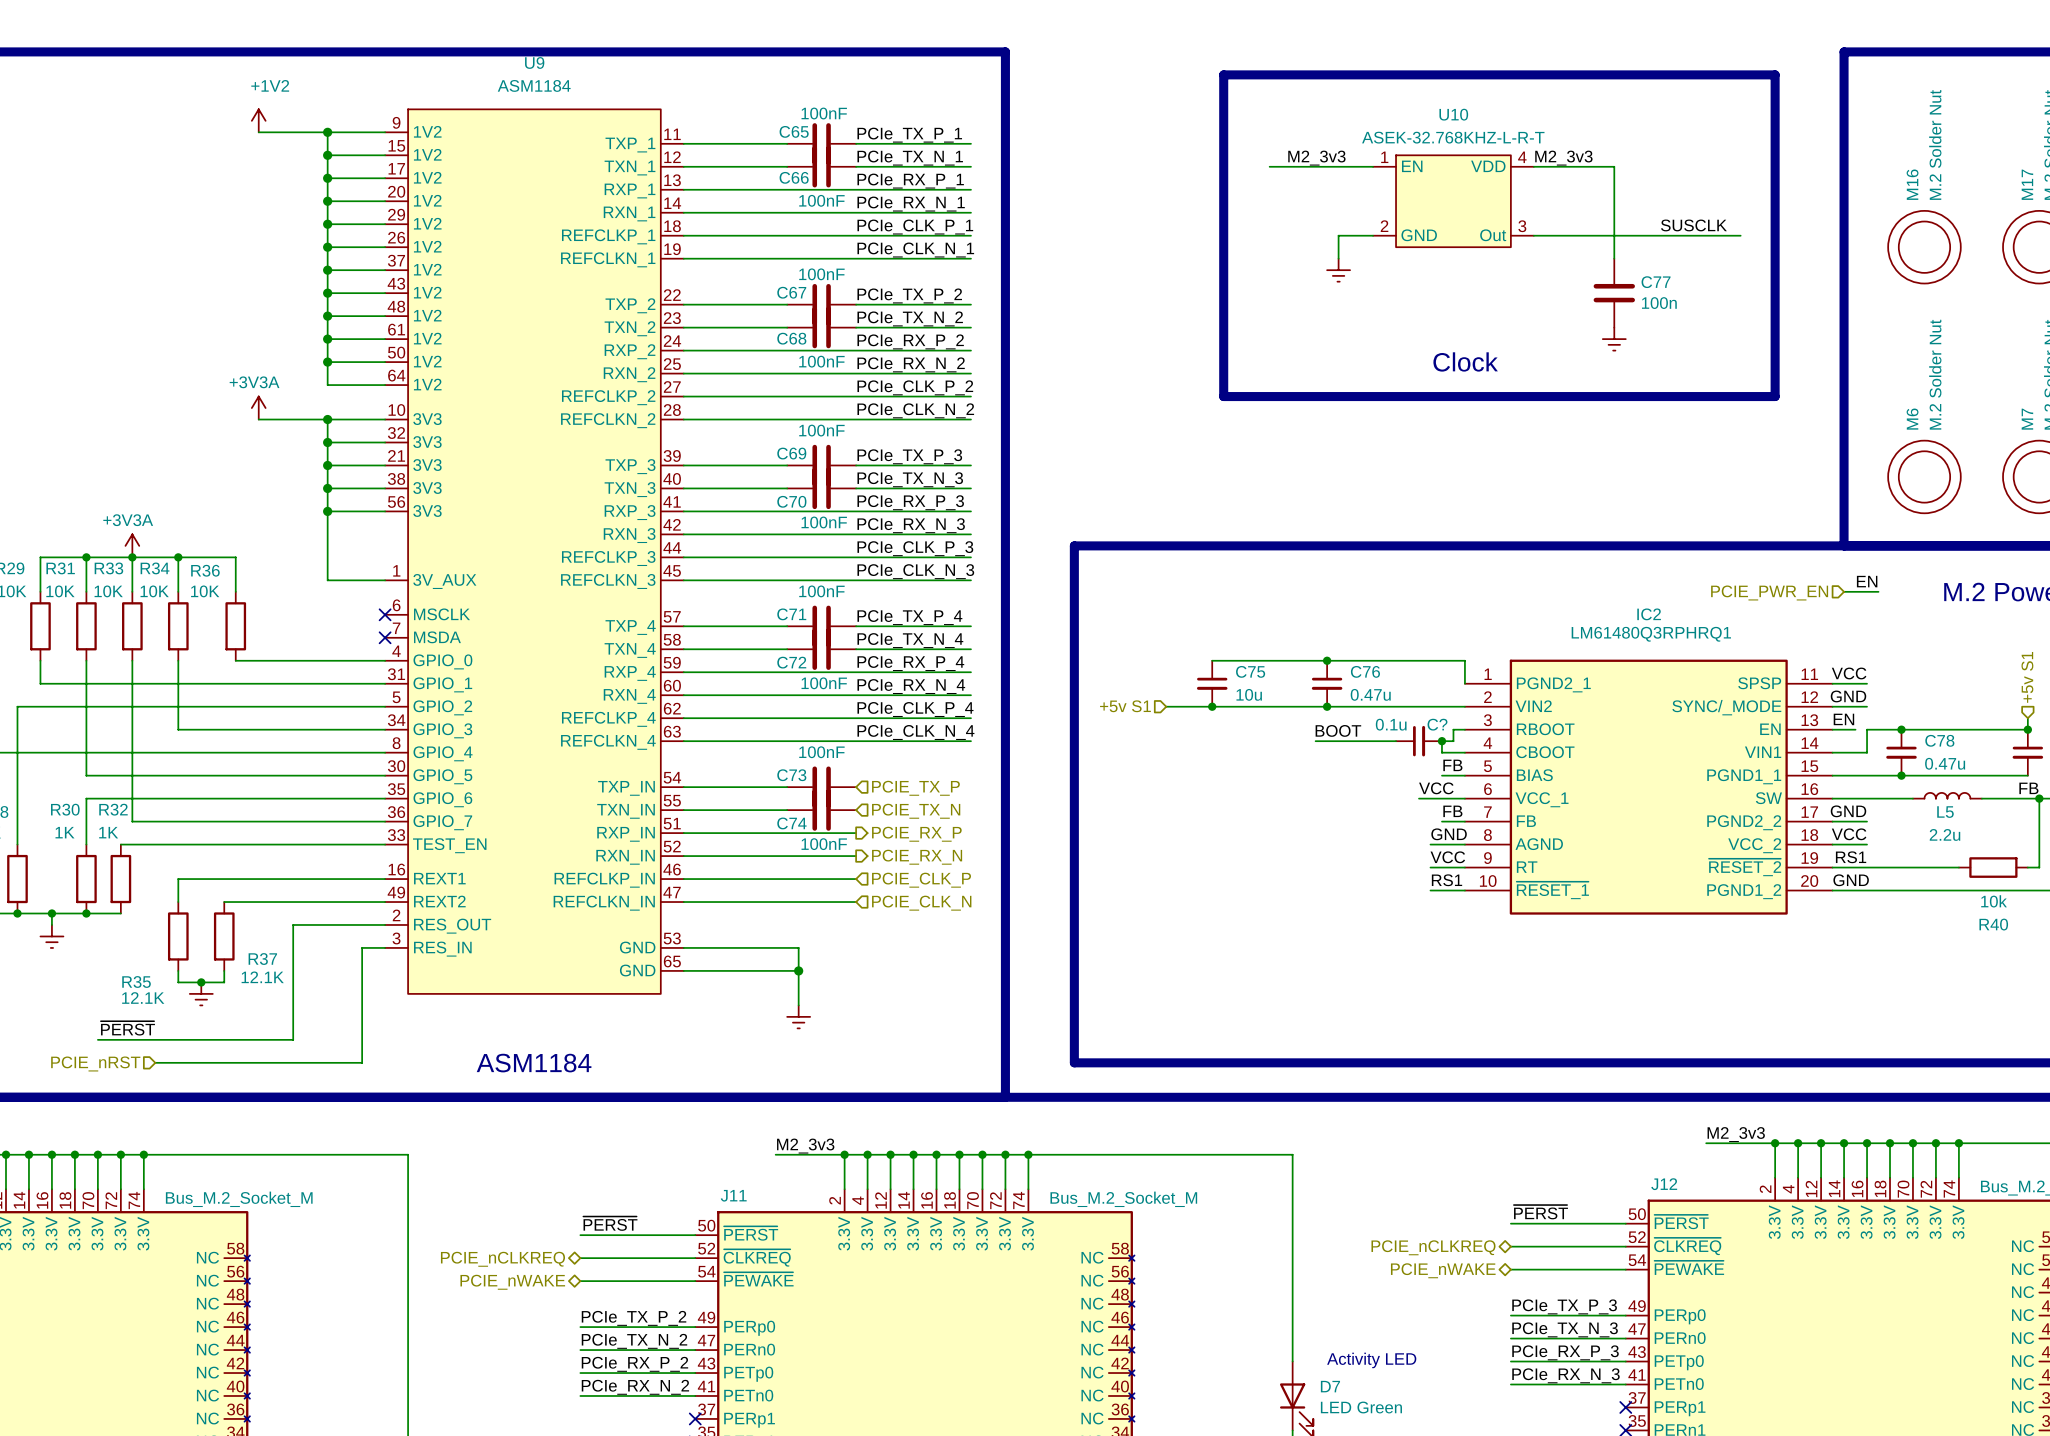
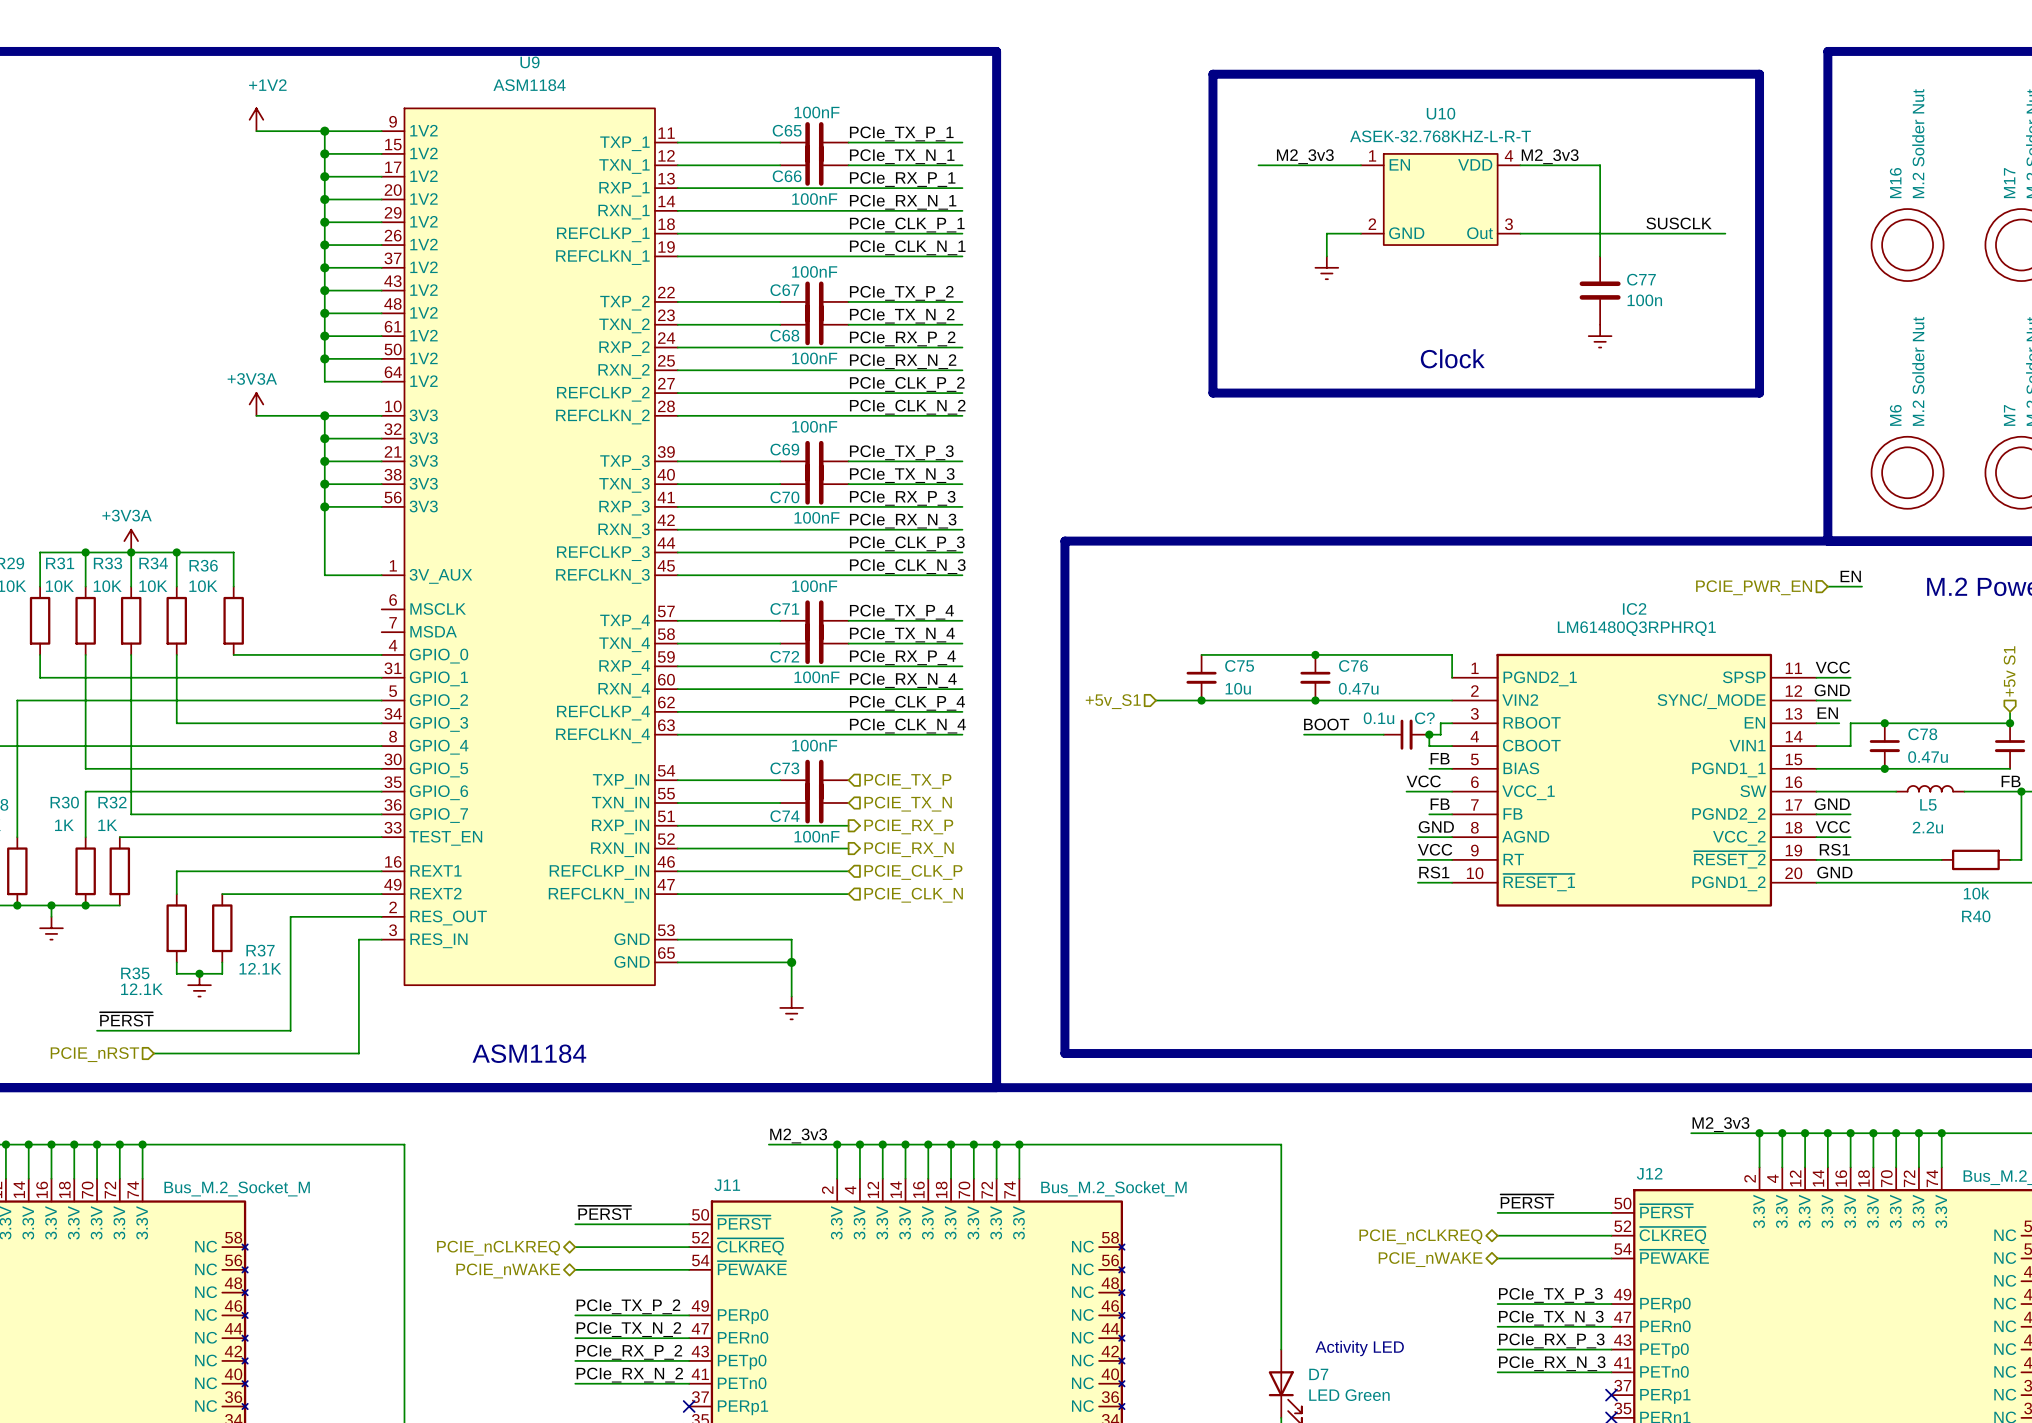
no-connect mark: (385, 614) -> none
no-connect mark: (385, 637) -> none
hierarchical label: +5v S1 (1125, 706) -> +5v_S1 (1113, 701)

